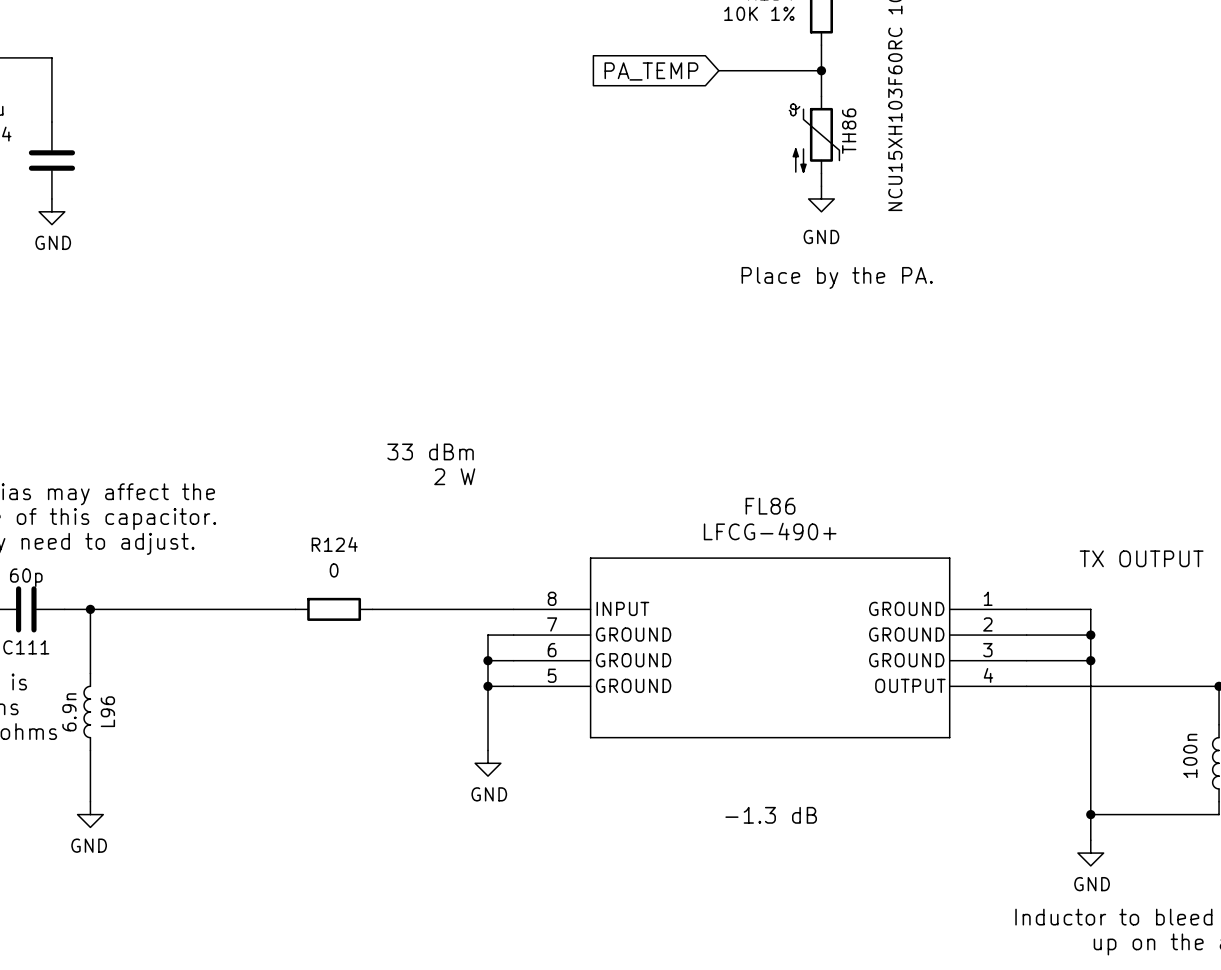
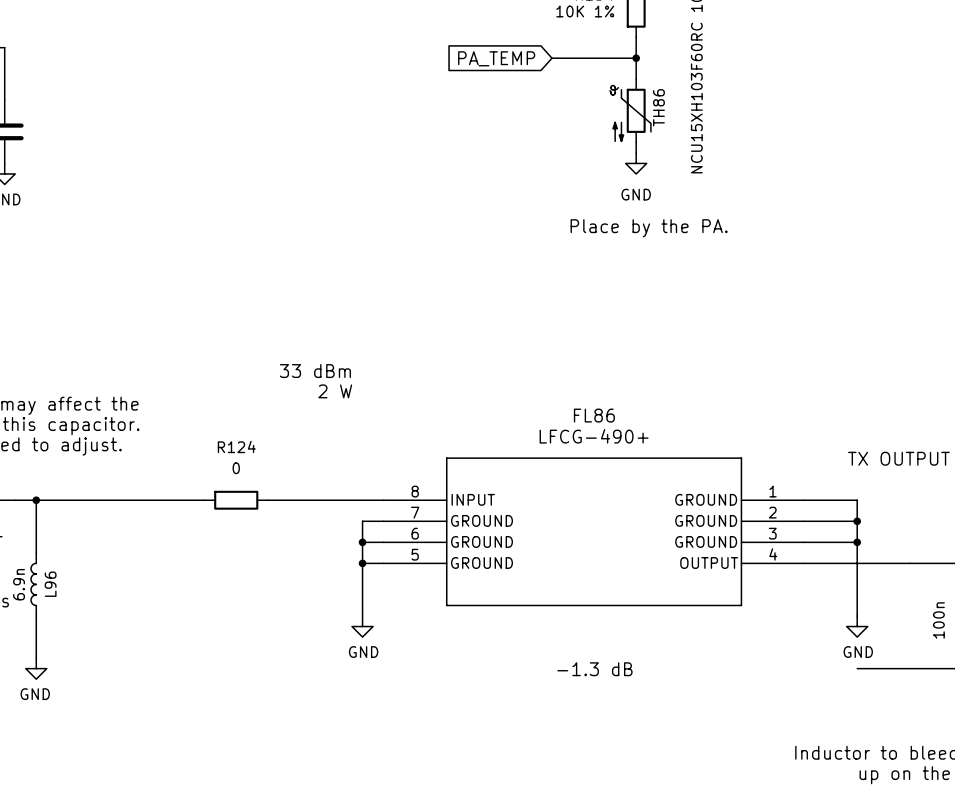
wire: (1090, 750) (1090, 840) -> none
junction: (1090, 814) -> none
power symbol position: GND (1090, 853) -> GND (857, 626)

